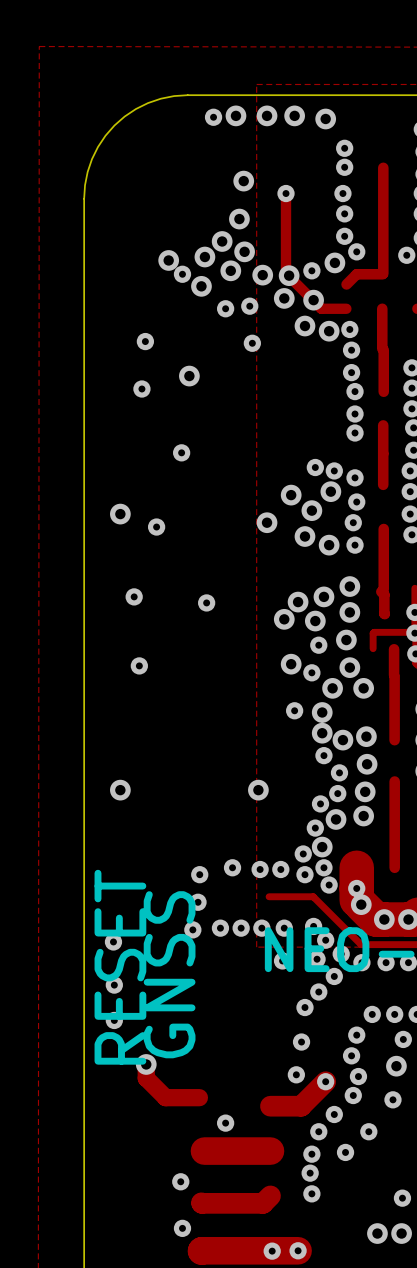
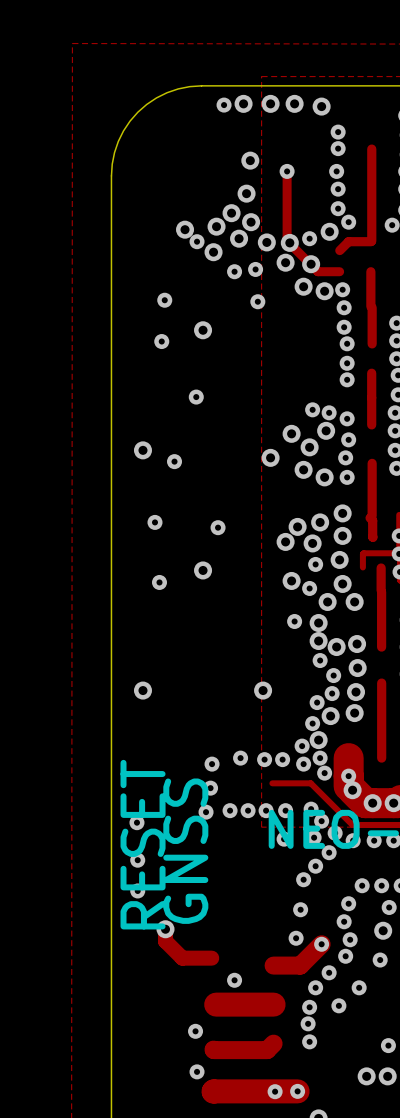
via: none -> (203, 570)

